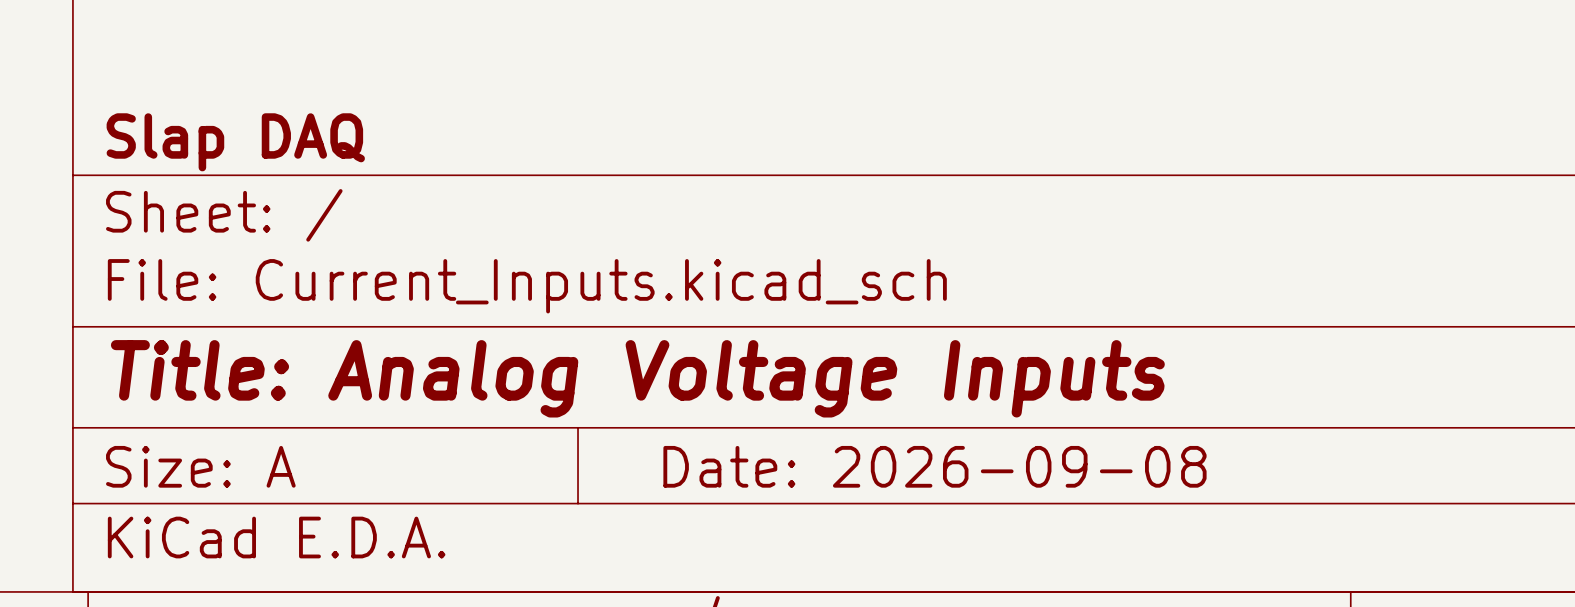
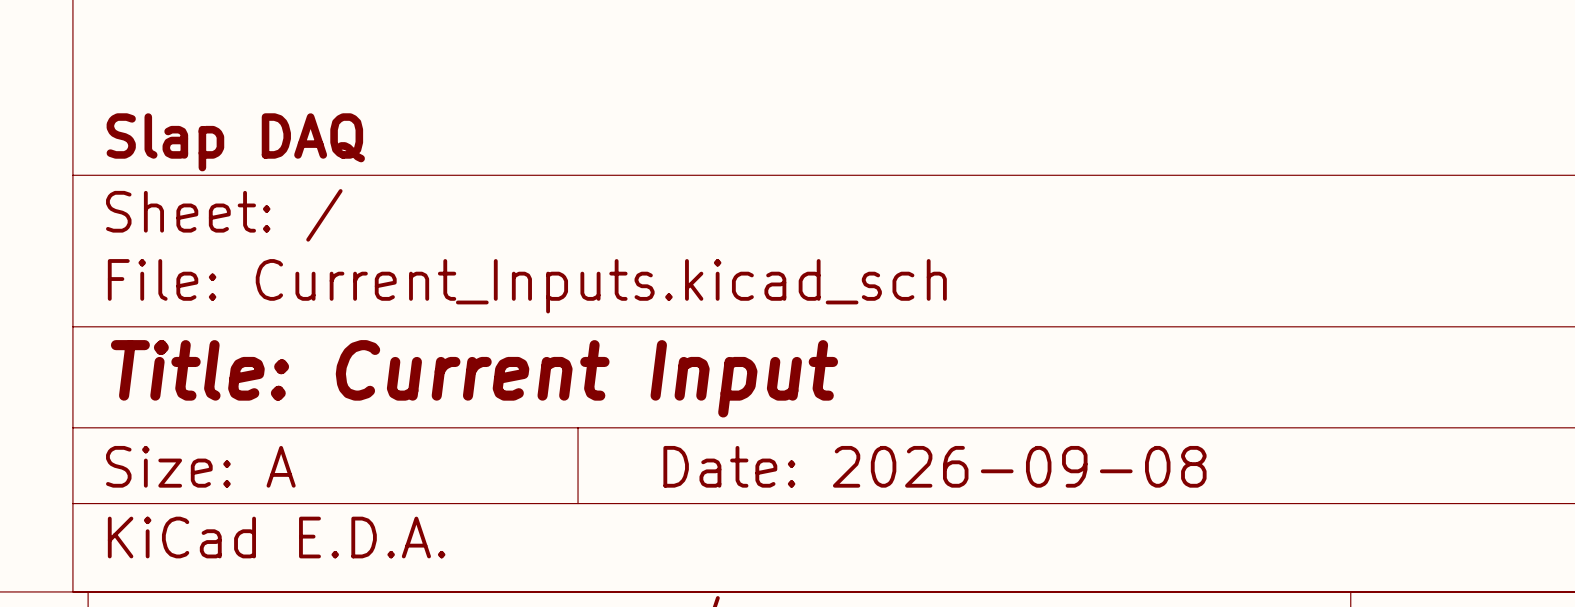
title block: Title: Analog Voltage Inputs (637, 378) -> Title: Current Input (474, 378)

